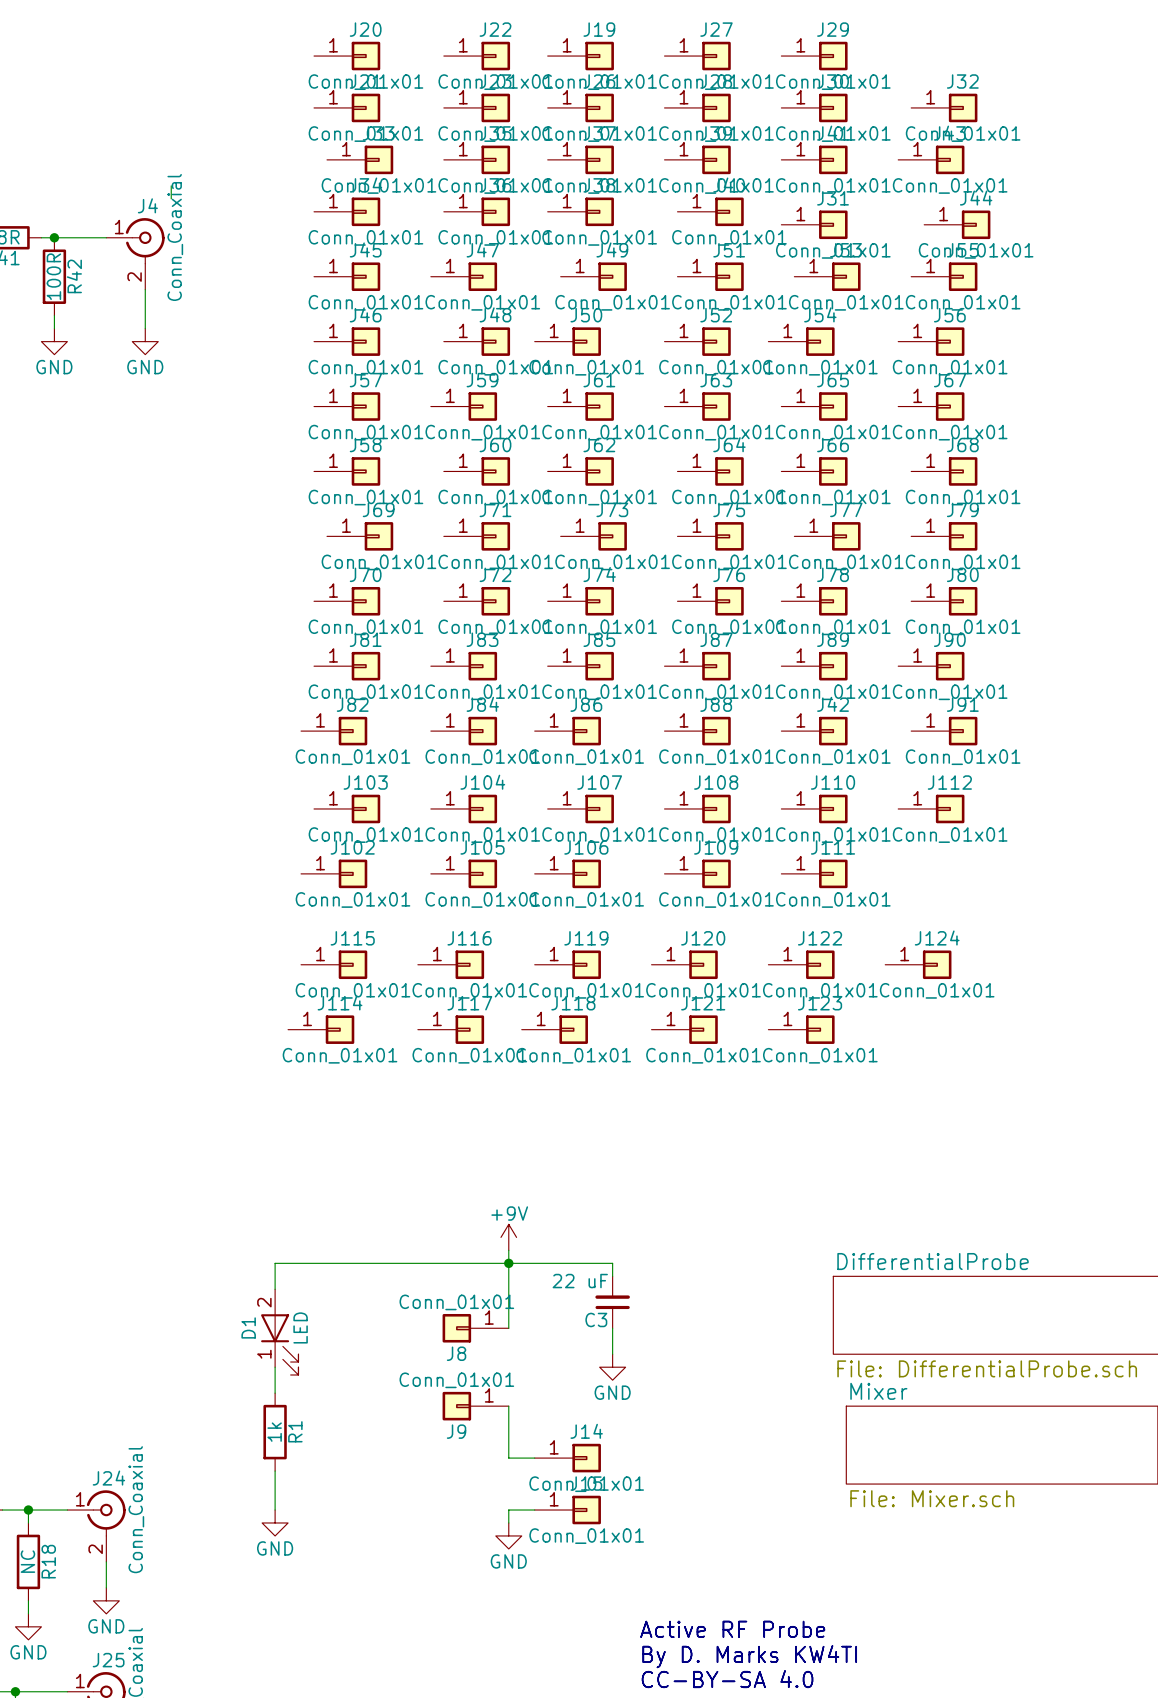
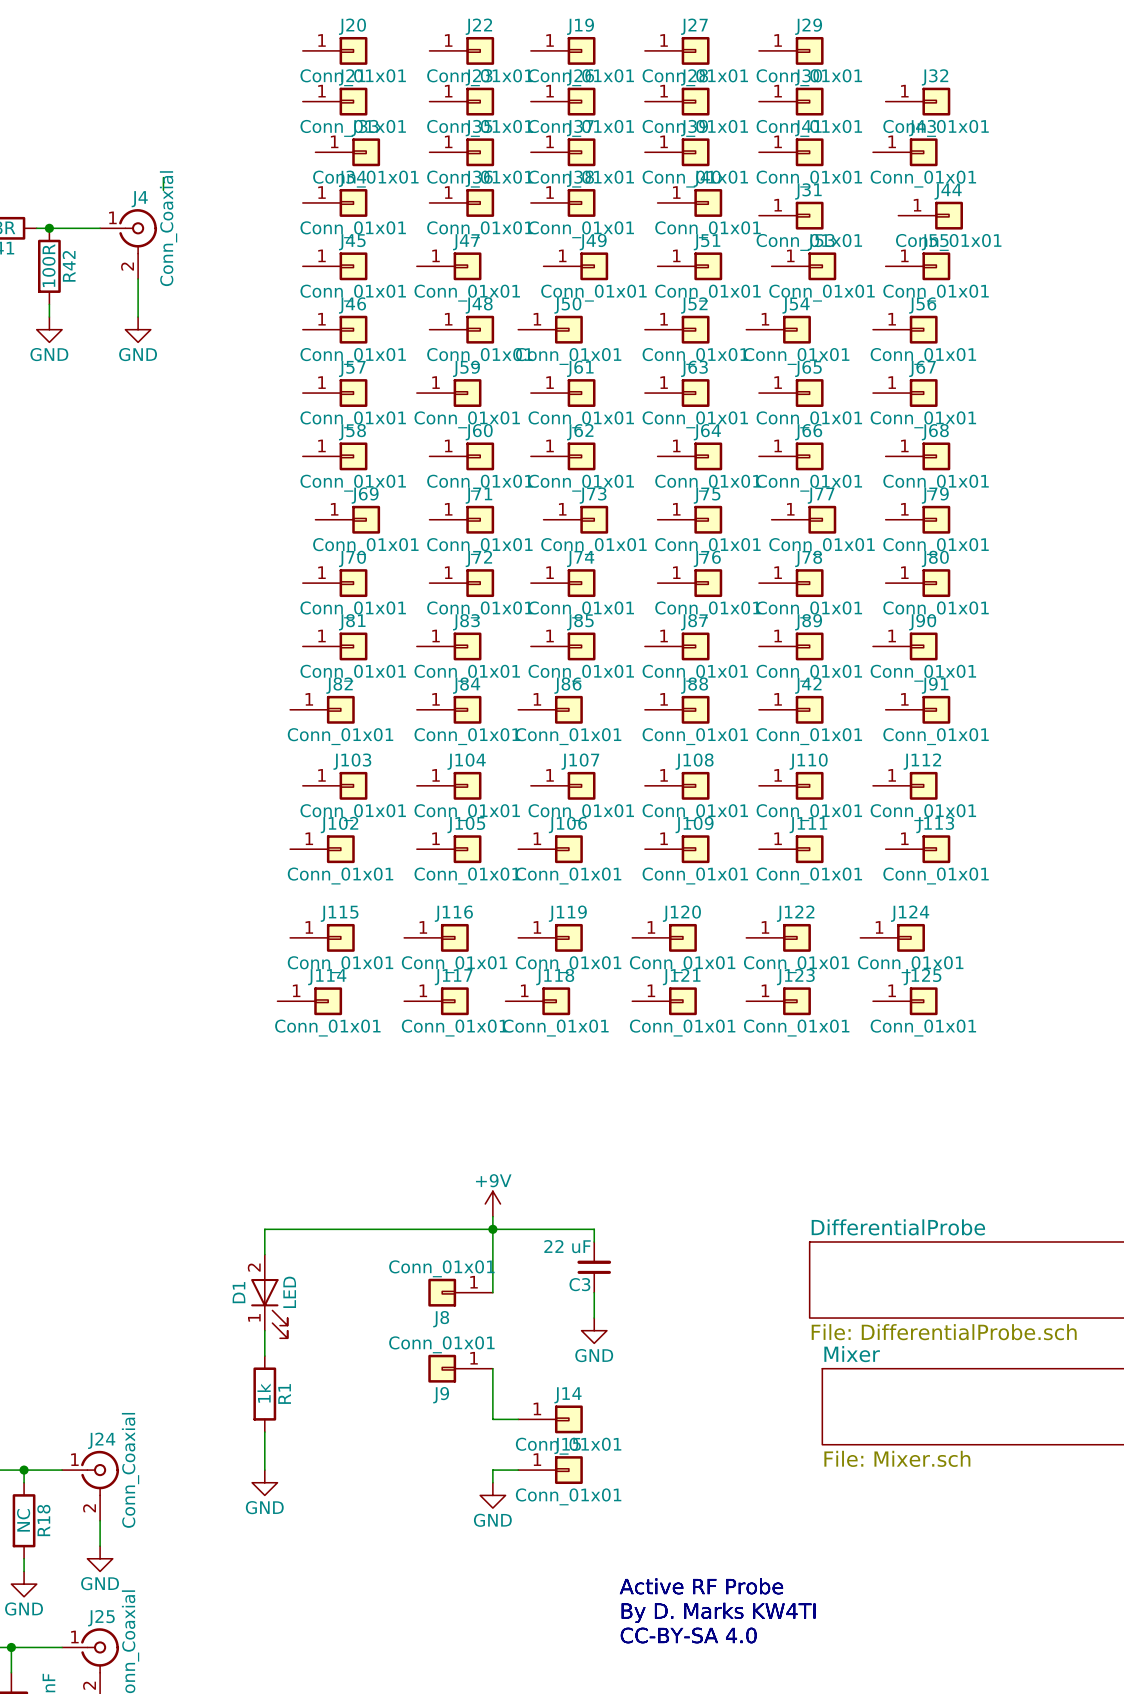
J113: none -> Conn_01x01 (917, 849)
J125: none -> Conn_01x01 (905, 1001)

